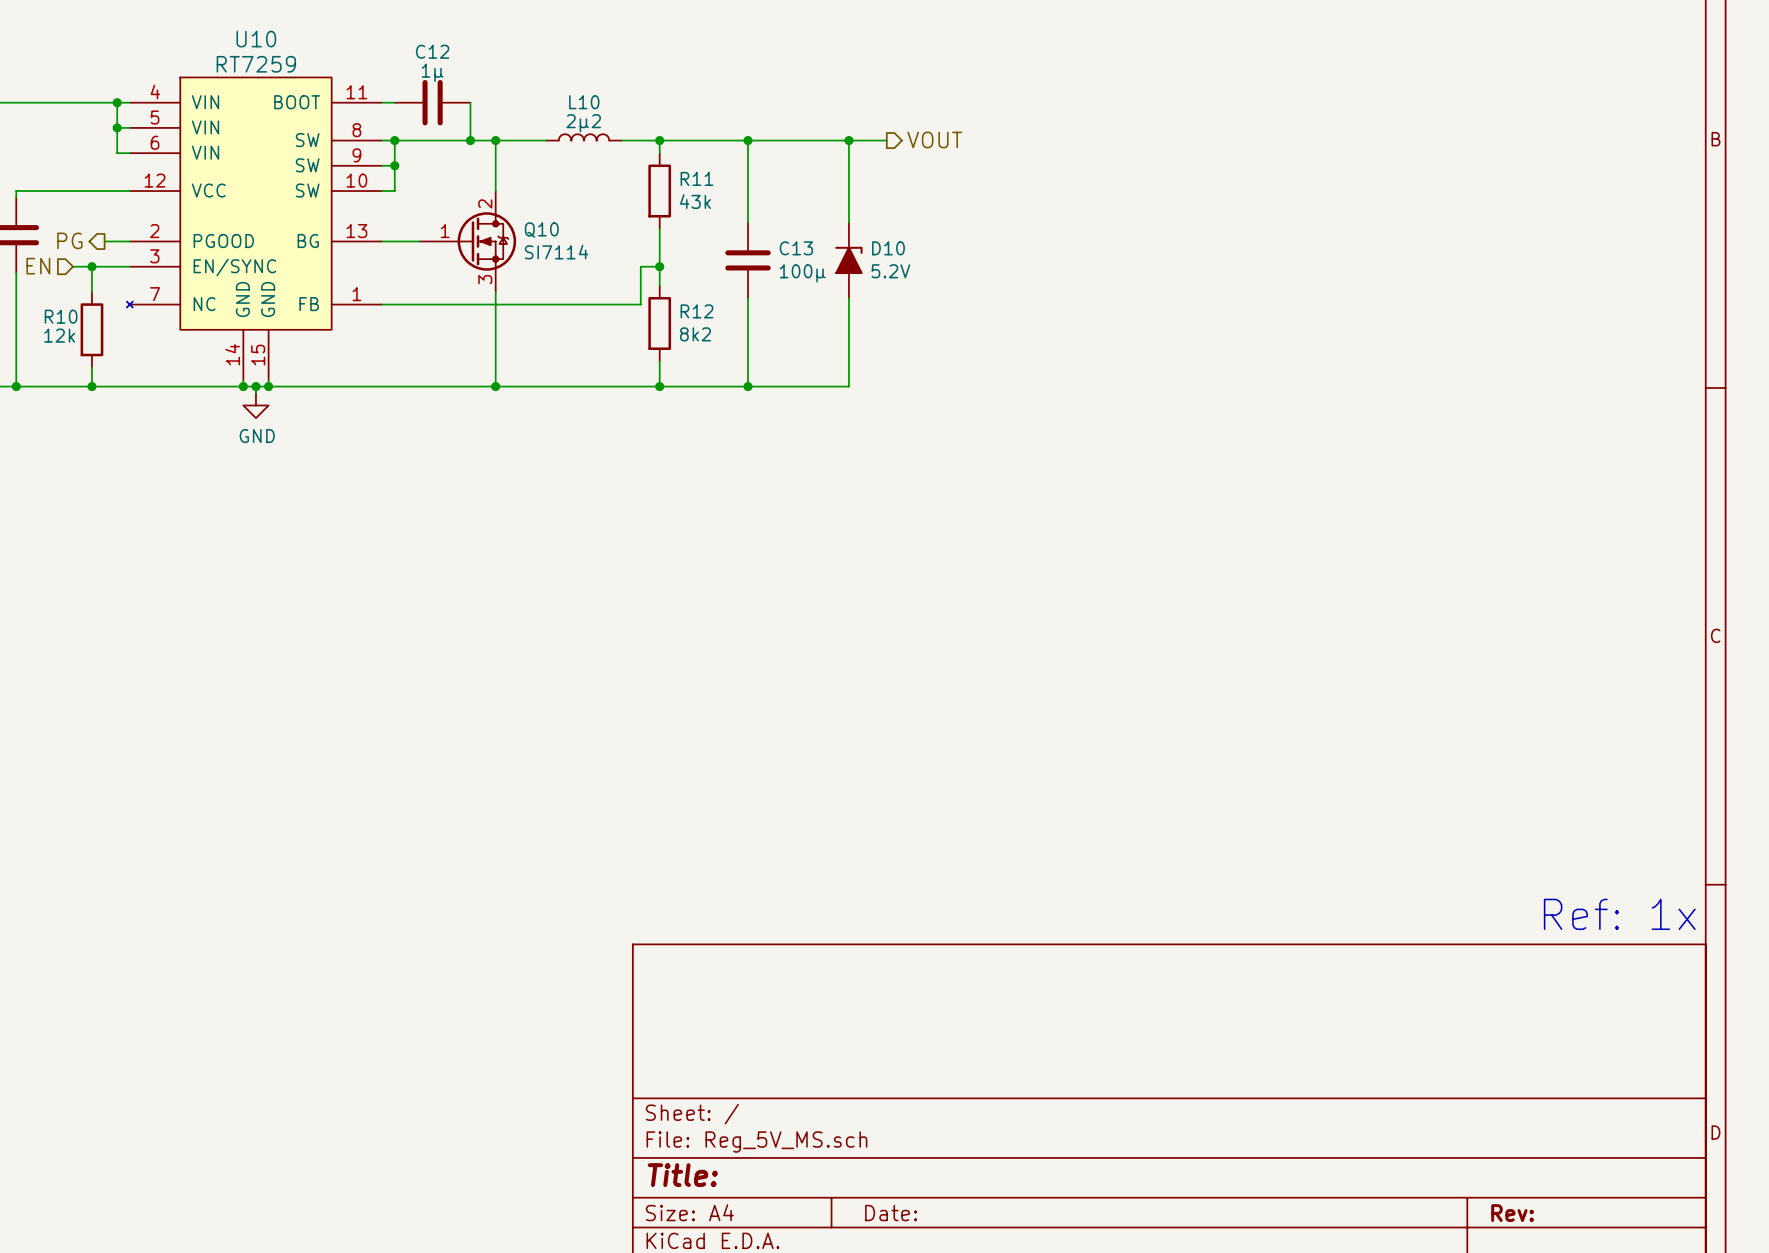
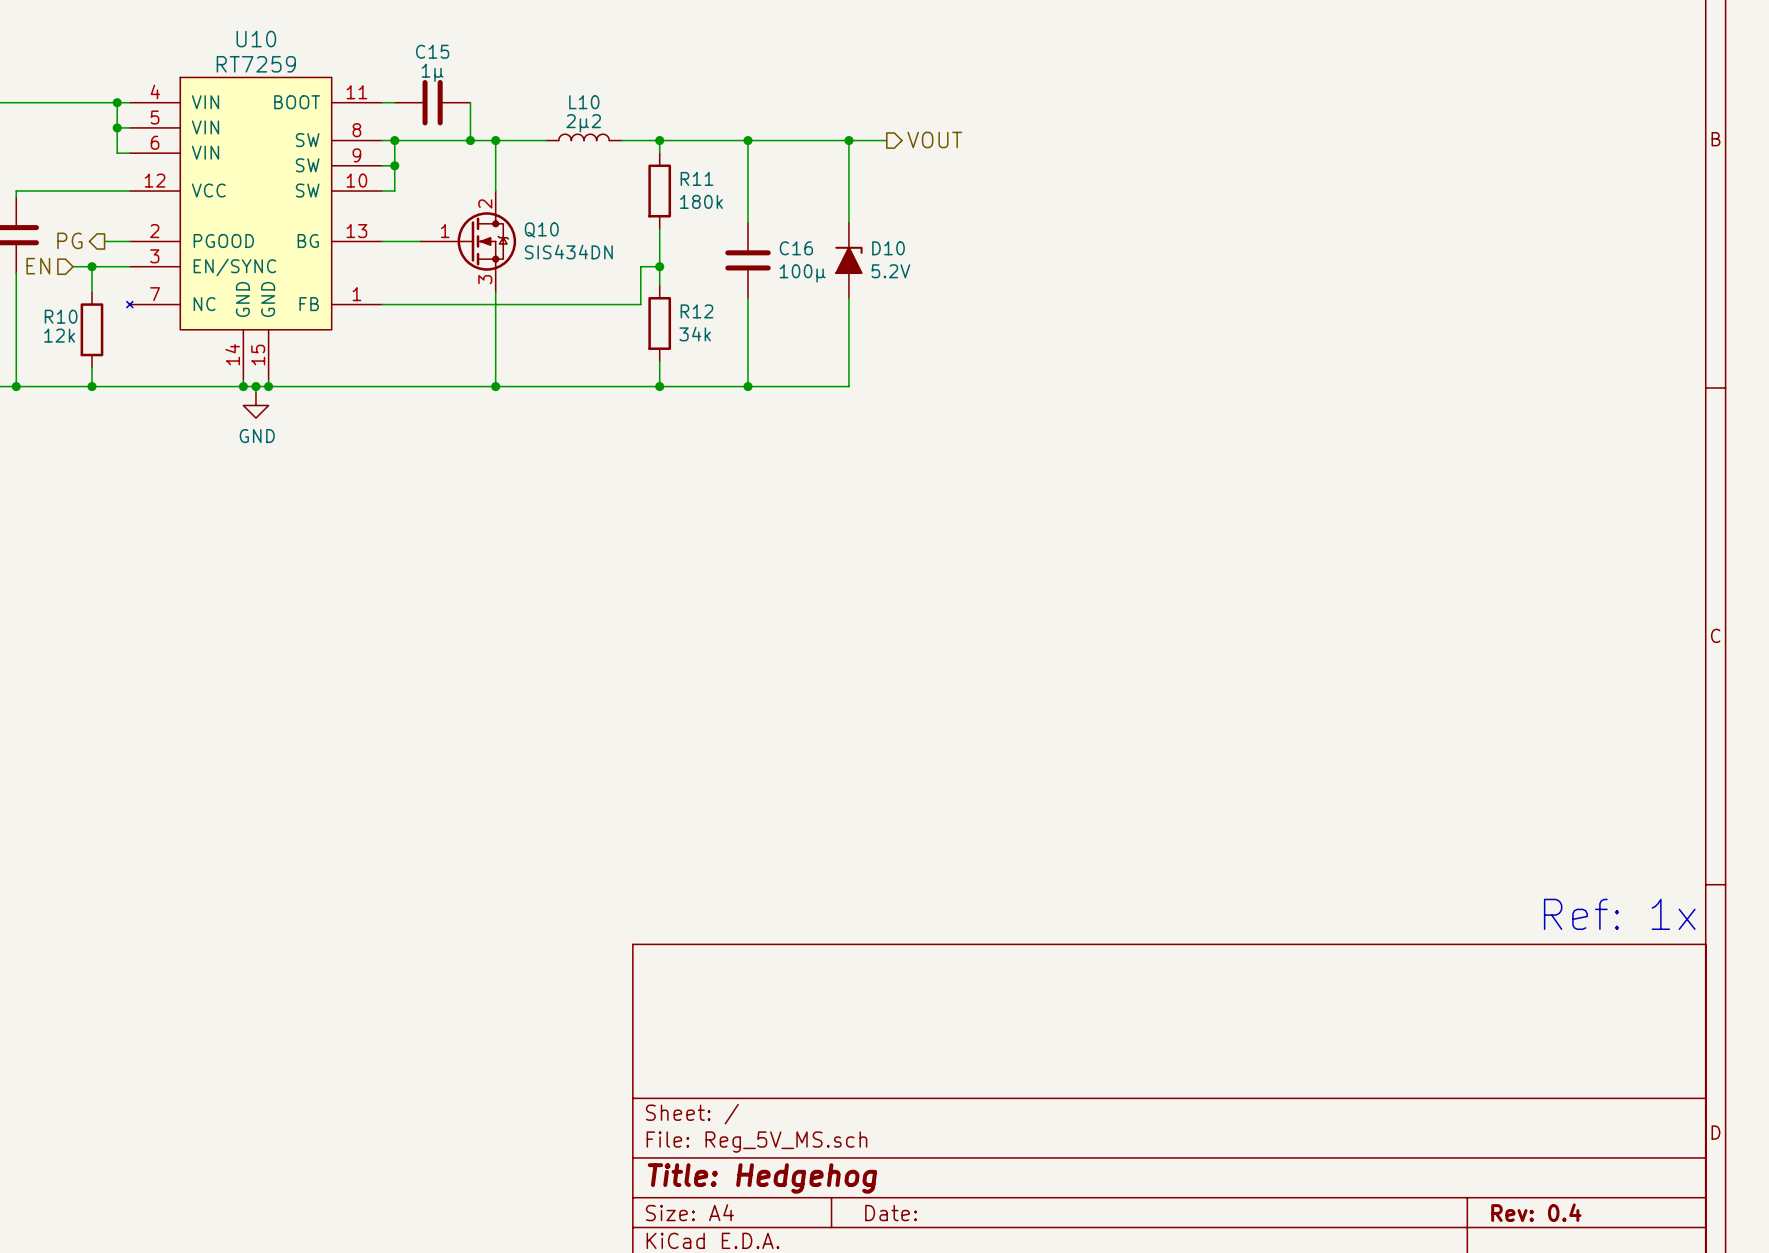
C12 name: C12 (432, 51) -> C15 (432, 51)
R11 value: 43k (695, 201) -> 180k (701, 201)
C13 name: C13 (796, 248) -> C16 (796, 248)
Q10 value: SI7114 (556, 252) -> SIS434DN (568, 252)
R12 value: 8k2 (695, 334) -> 34k (695, 334)
title block: Title: (682, 1175) -> Title: Hedgehog (762, 1178)
title block: Rev: (1512, 1213) -> Rev: 0.4 (1536, 1212)

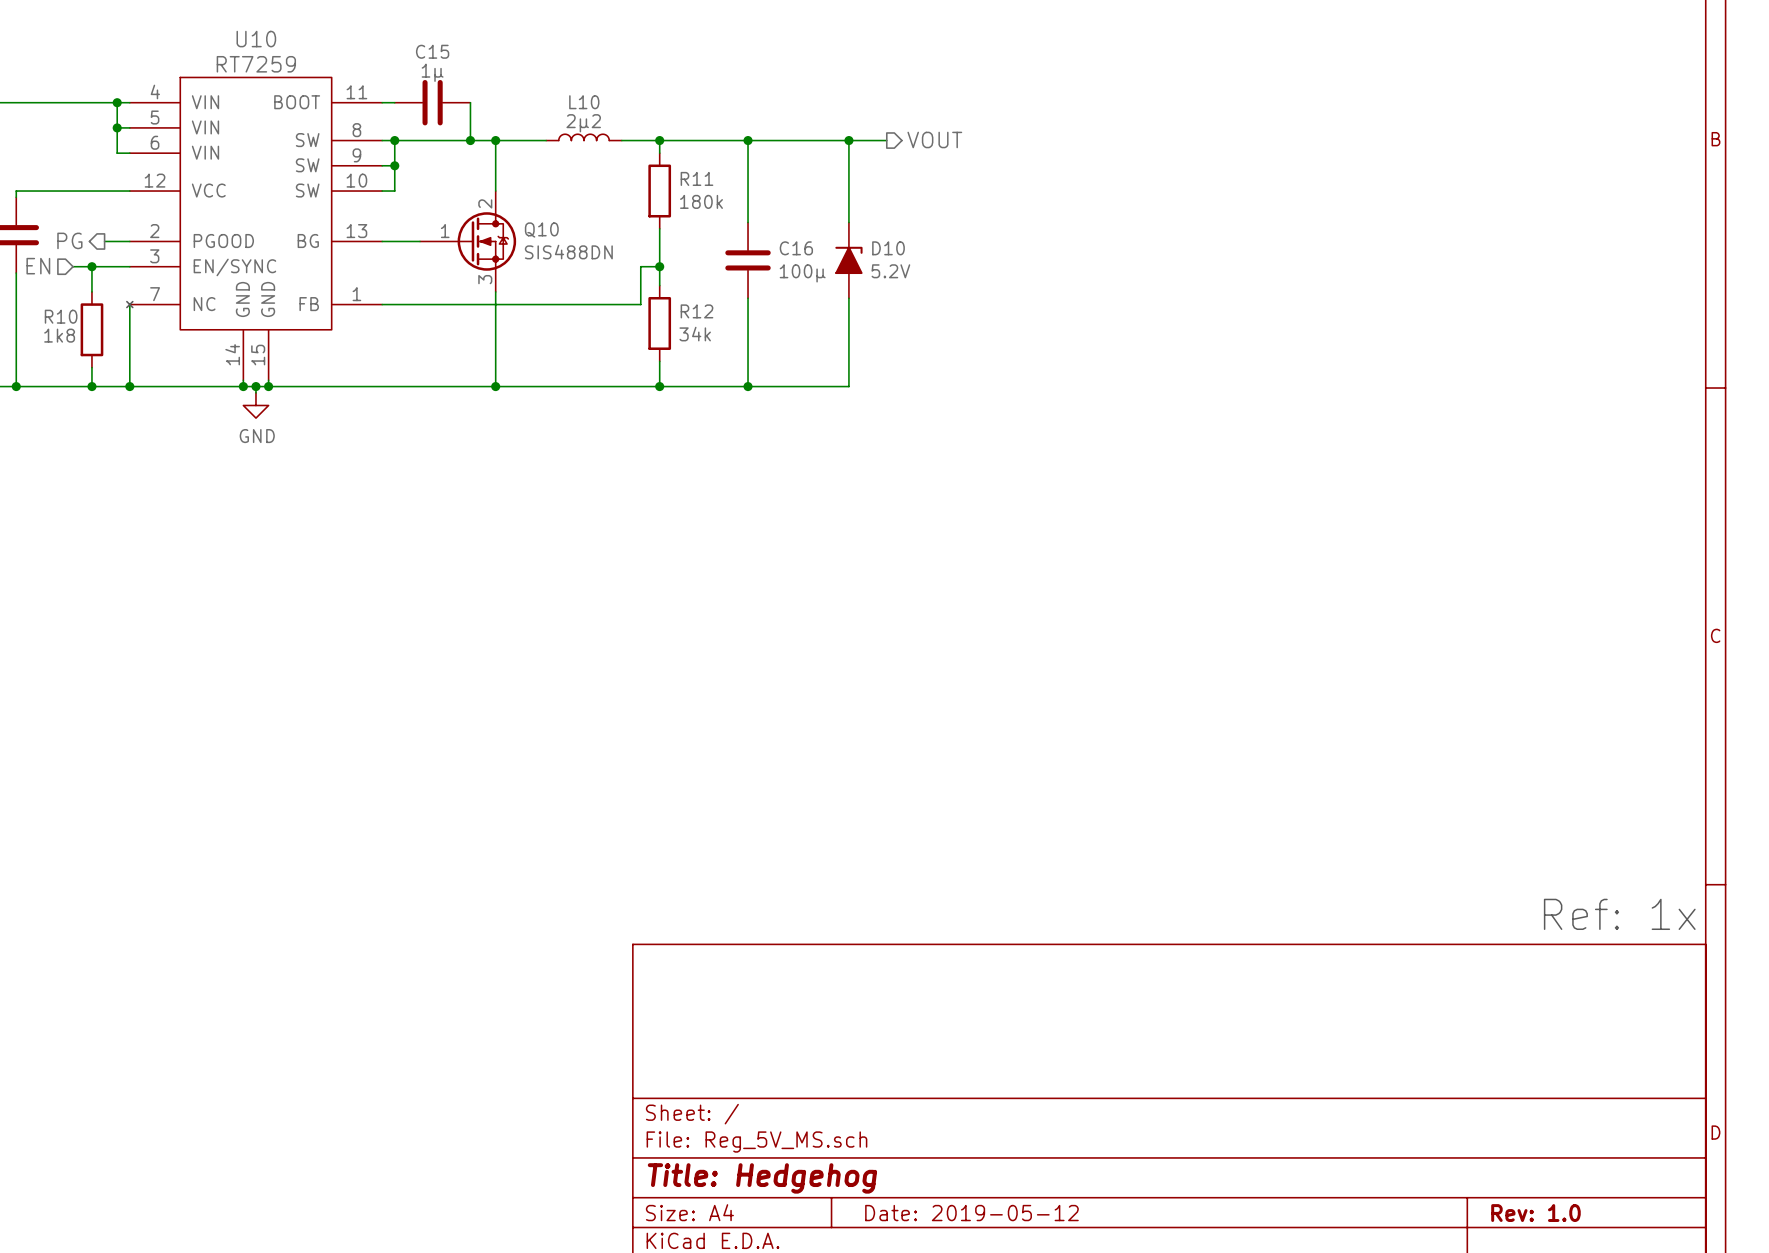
Q10 value: SIS434DN (568, 252) -> SIS488DN (568, 252)
wire: none -> (129, 304) (129, 386)
R10 value: 12k (59, 335) -> 1k8 (59, 335)
junction: none -> (129, 386)
title block: Rev: 0.4 (1536, 1212) -> Rev: 1.0 (1535, 1213)
title block: Date: (891, 1213) -> Date: 2019-05-12 (971, 1213)

